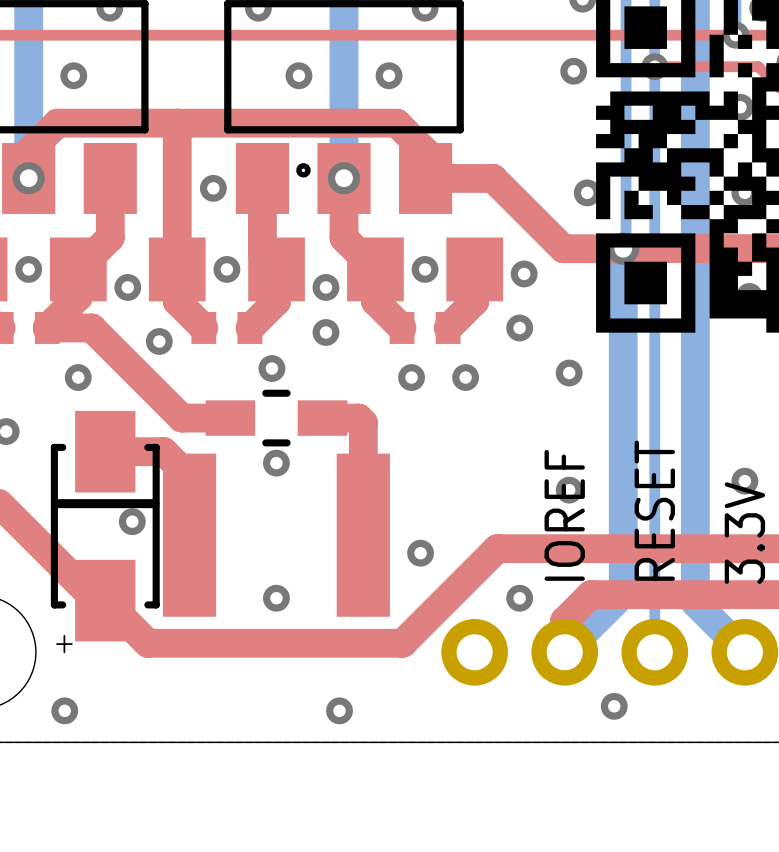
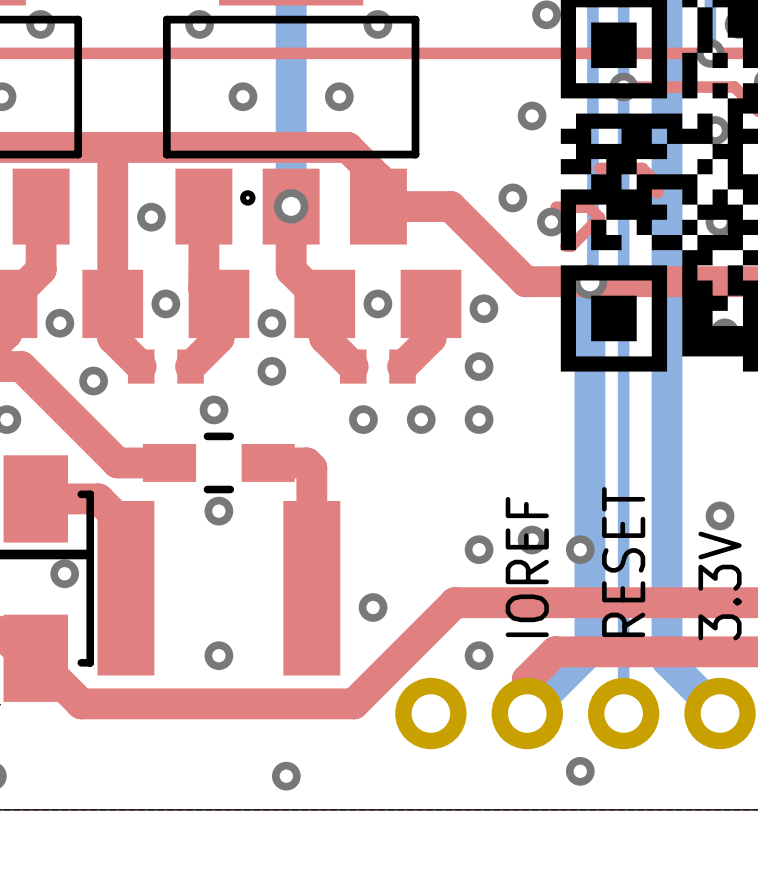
via position: (573, 71) -> (532, 116)
top track: none -> (599, 168) (642, 168) (657, 183) (657, 193)
via: none -> (512, 197)
top track: none -> (556, 207) (589, 207) (599, 217) (571, 246) (565, 246)
via position: (569, 373) -> (479, 419)
via position: (744, 481) -> (720, 515)
via: none -> (479, 549)
via: none -> (580, 549)

